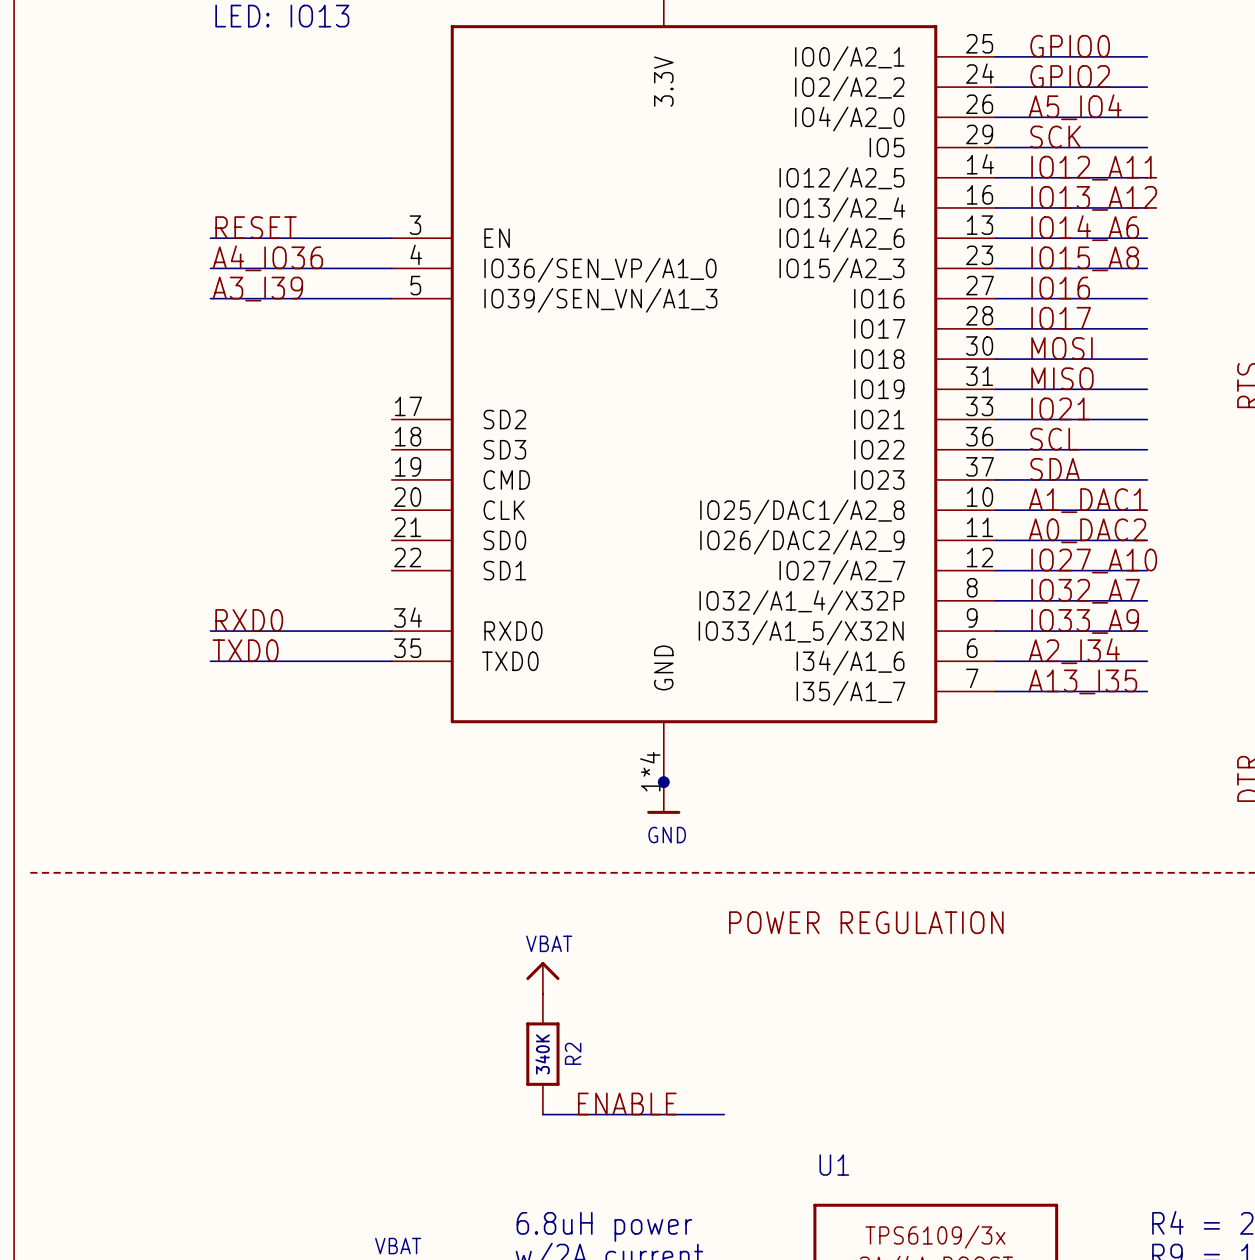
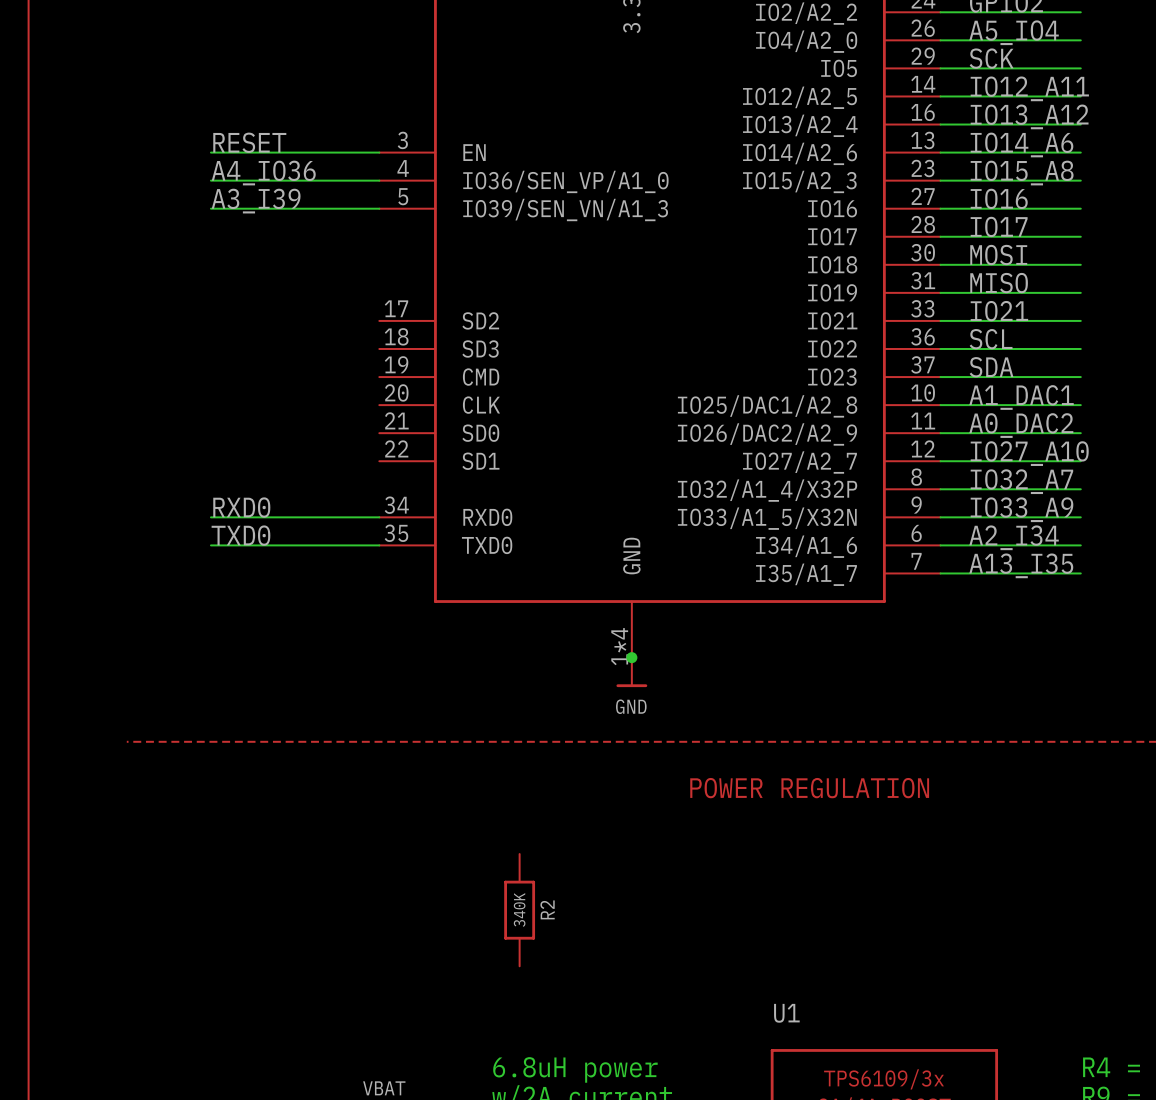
line: (29, 872) (119, 872) -> none
power symbol: VBAT (542, 977) -> none
label: ENABLE (627, 1104) -> none
wire: (542, 1114) (724, 1114) -> none

